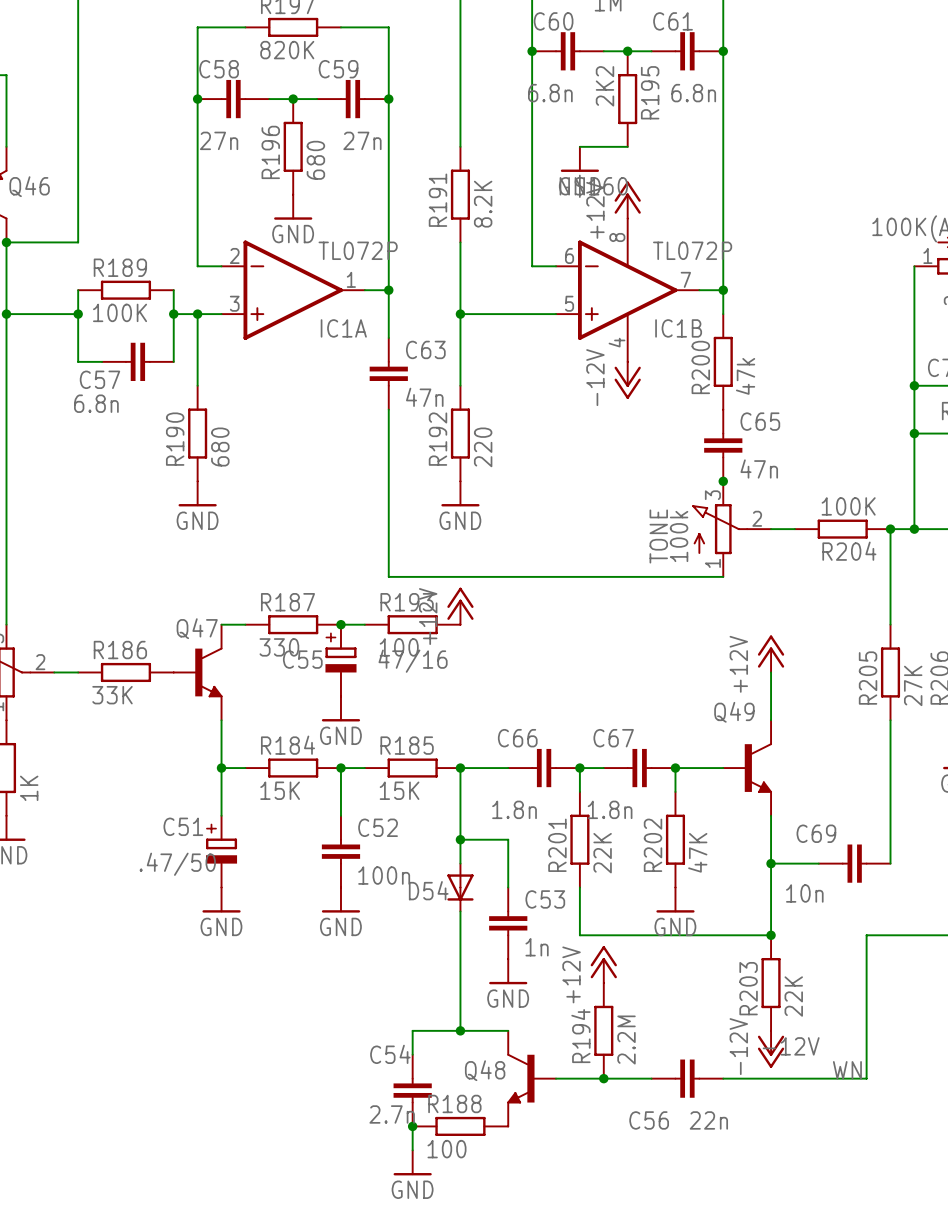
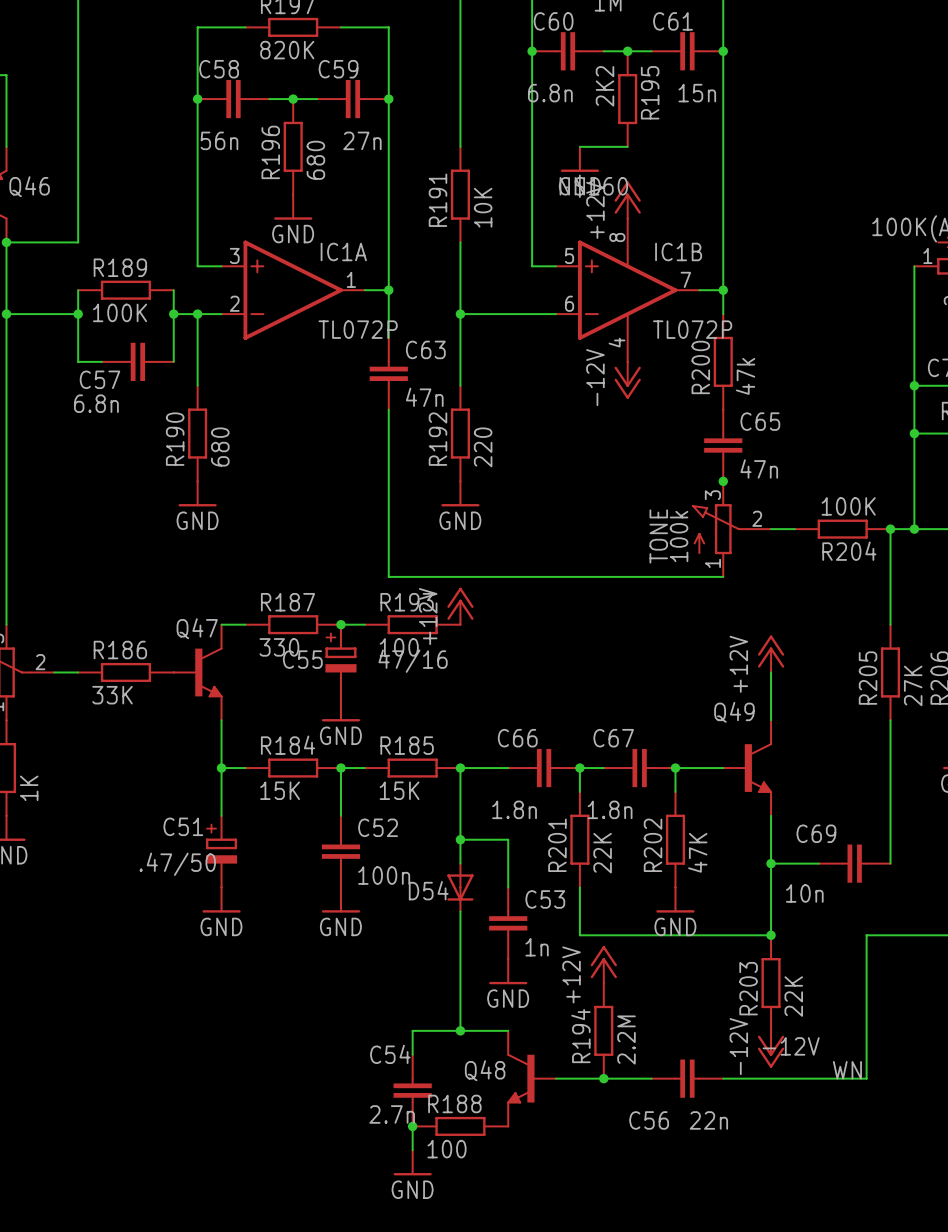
C61 value: 6.8n (693, 93) -> 15n (697, 93)
C58 value: 27n (219, 140) -> 56n (219, 140)
R191 value: 8.2K (483, 204) -> 10K (483, 207)
IC1A flip: as is (293, 290) -> up-down (293, 290)
IC1B flip: as is (627, 290) -> up-down (627, 290)

